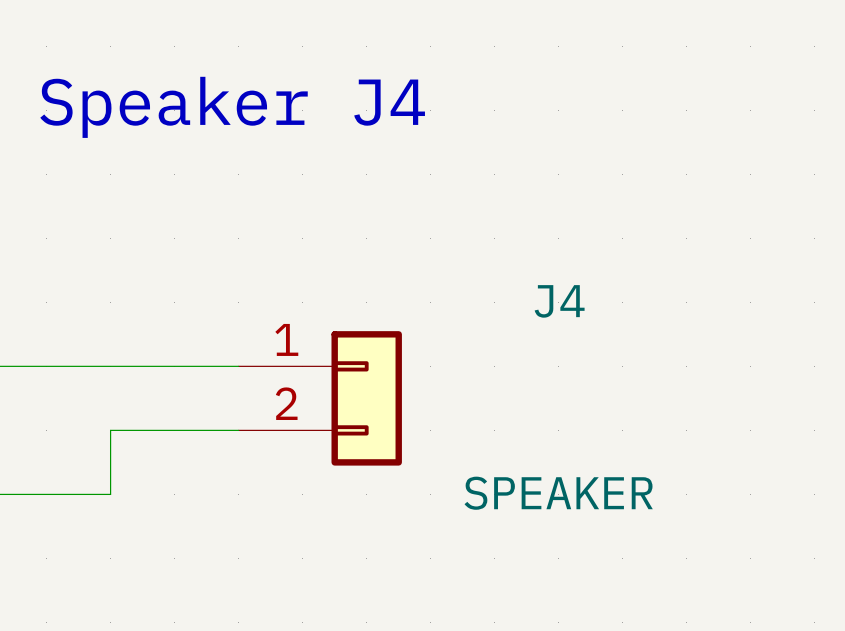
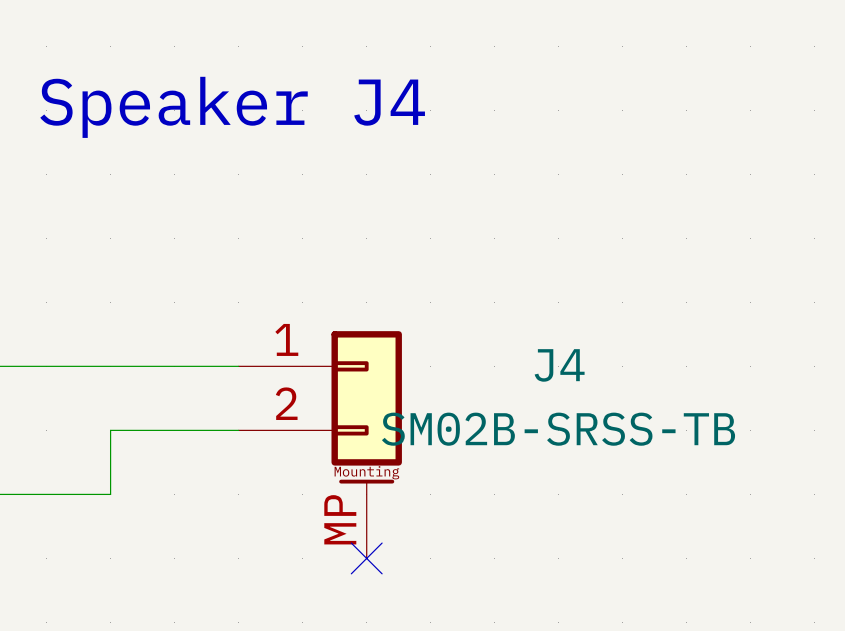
J4 symbol: [238, 331, 402, 466] -> [238, 331, 402, 559]
J4 value: SPEAKER (558, 493) -> SM02B-SRSS-TB (558, 429)
no-connect mark: none -> (366, 558)

